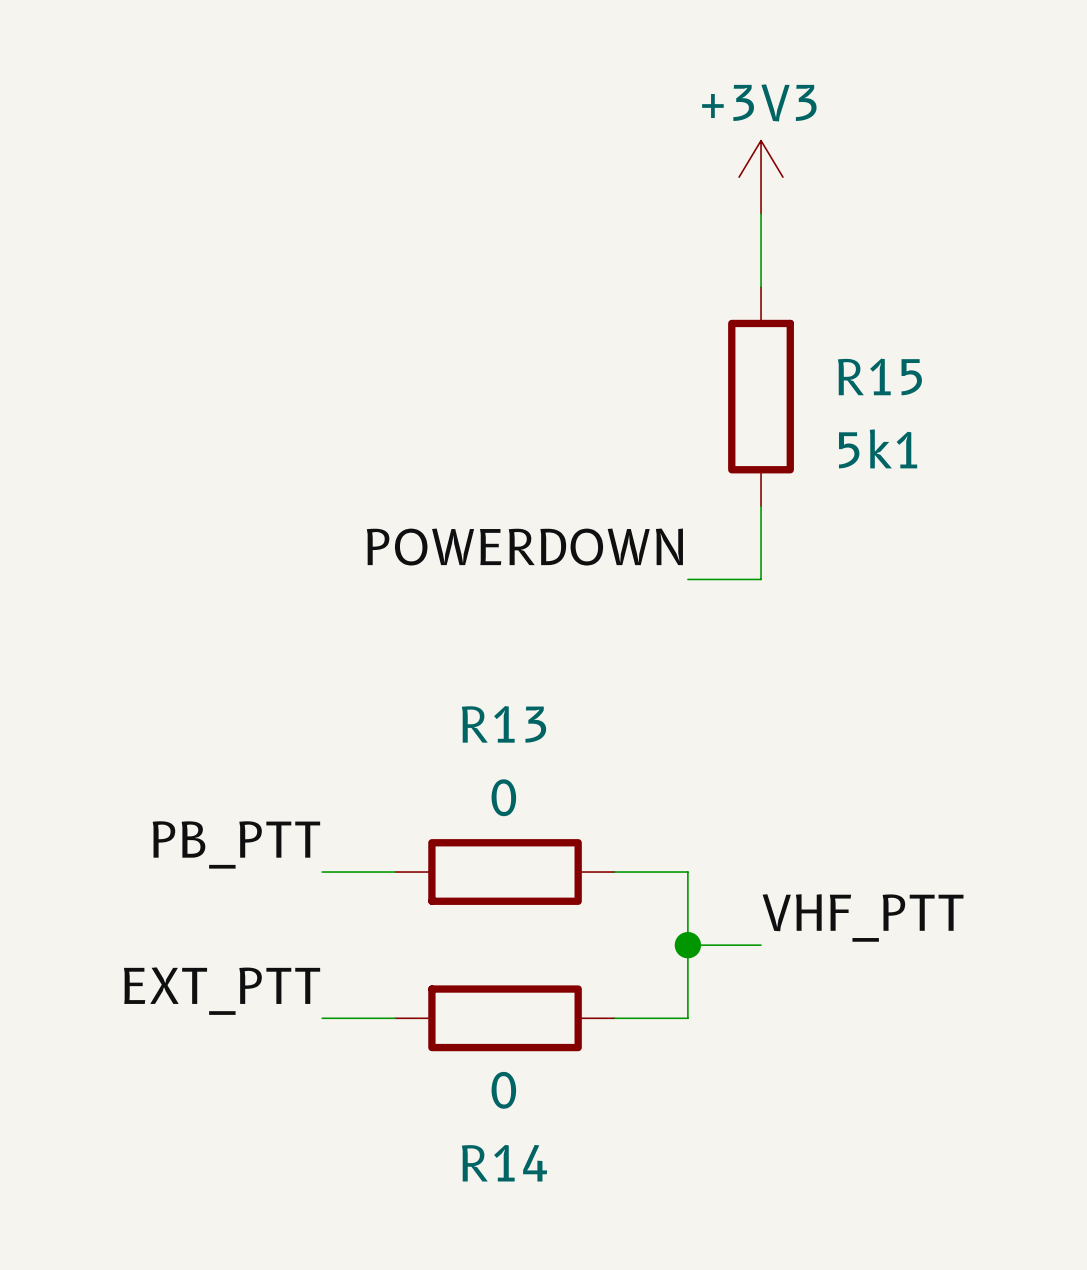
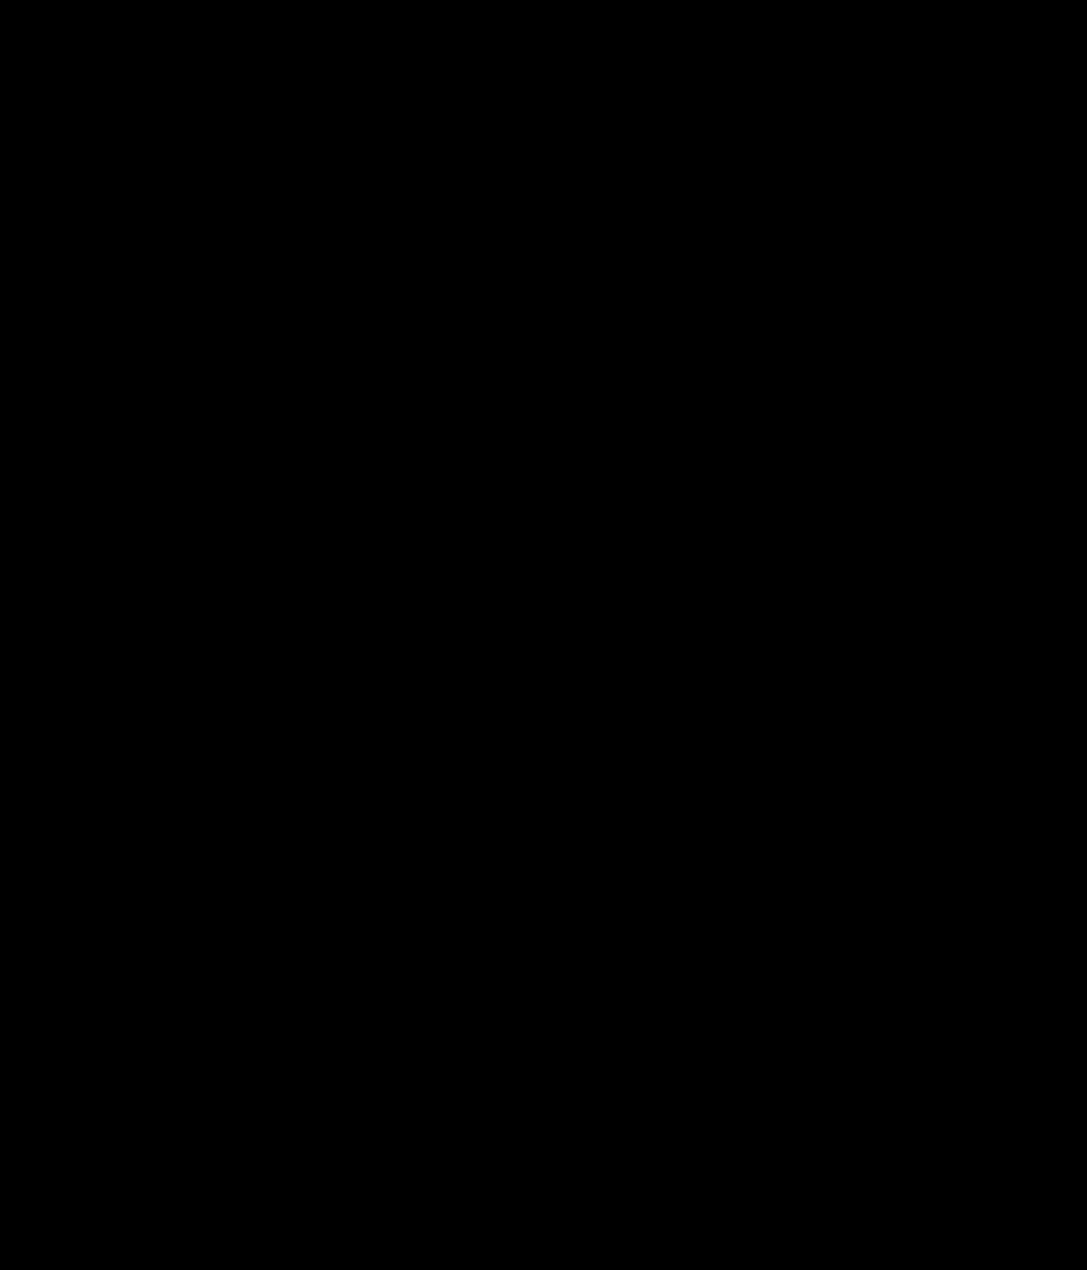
power symbol: +3V3 (761, 177) -> none
wire: (761, 213) (761, 286) -> none
R15: 5k1 (761, 396) -> none
wire: (761, 506) (761, 579) (687, 579) -> none
label: POWERDOWN (524, 547) -> none
label: PB_PTT (236, 844) -> none
wire: (322, 872) (395, 872) -> none
R13: 0 (505, 872) -> none
wire: (614, 872) (687, 872) (687, 1018) (614, 1018) -> none
label: VHF_PTT (863, 917) -> none
wire: (687, 945) (761, 945) -> none
junction: (687, 945) -> none
label: EXT_PTT (222, 991) -> none
wire: (322, 1018) (395, 1018) -> none
R14: 0 (505, 1018) -> none

